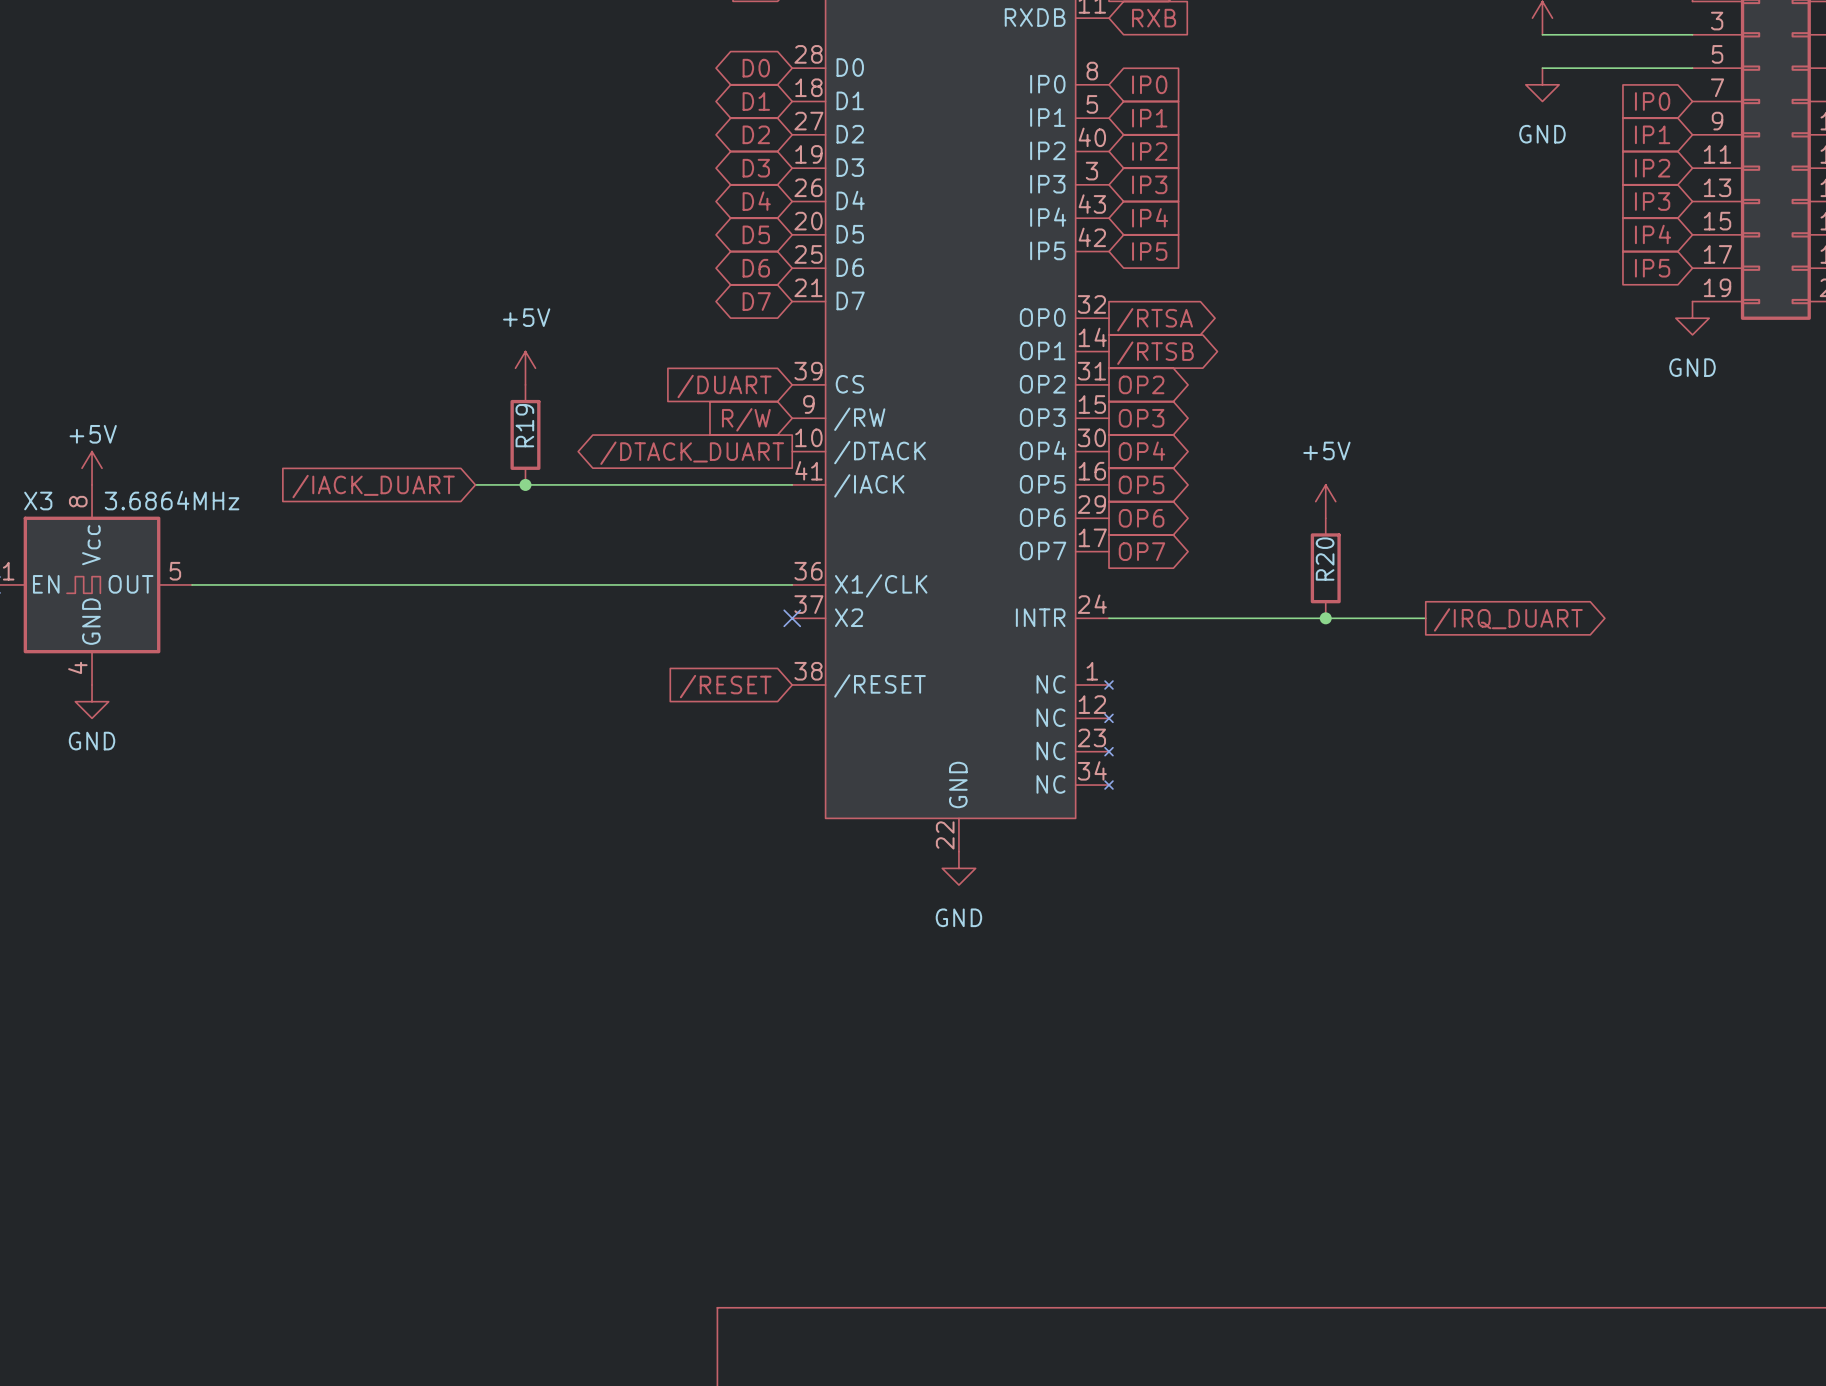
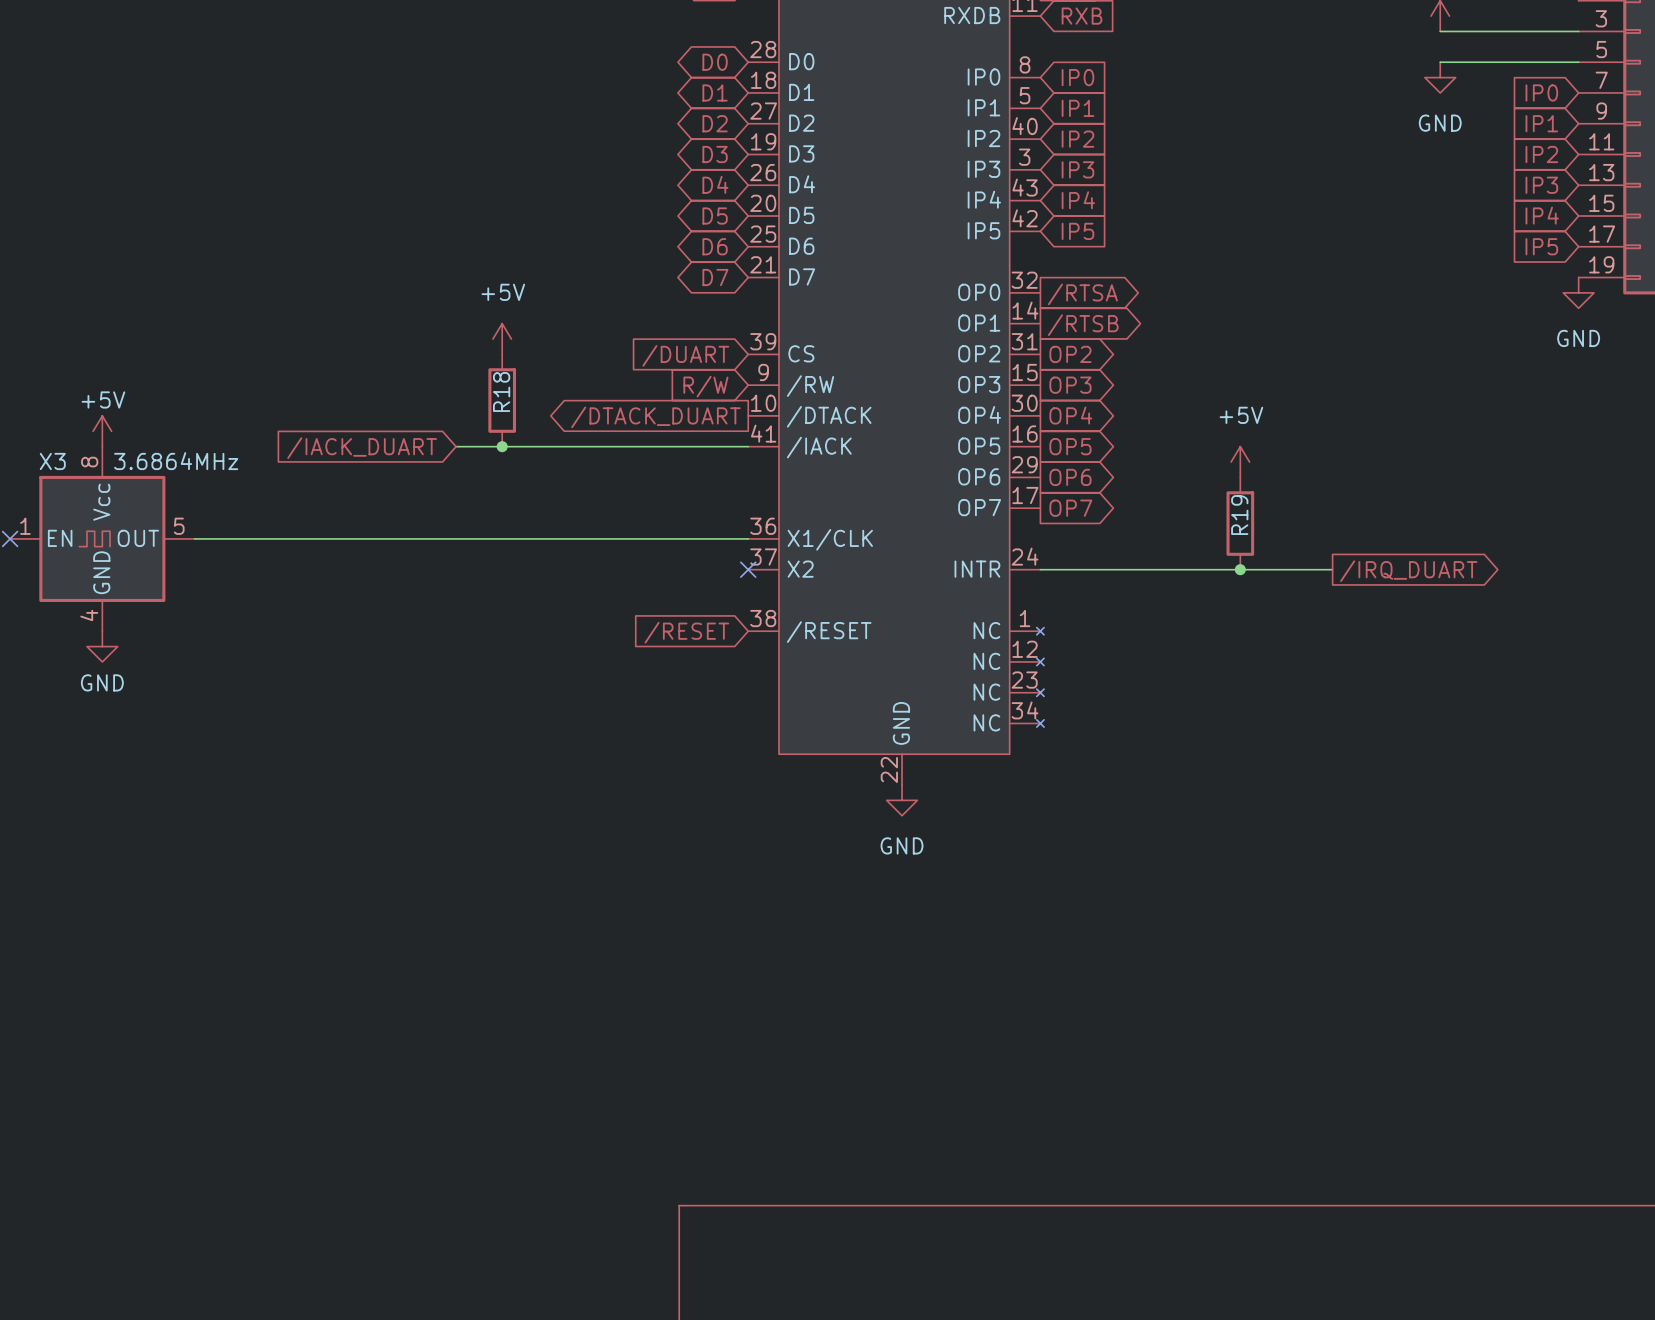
R19 name: R19 (524, 425) -> R18 (501, 392)
R20 name: R20 (1325, 559) -> R19 (1239, 515)

